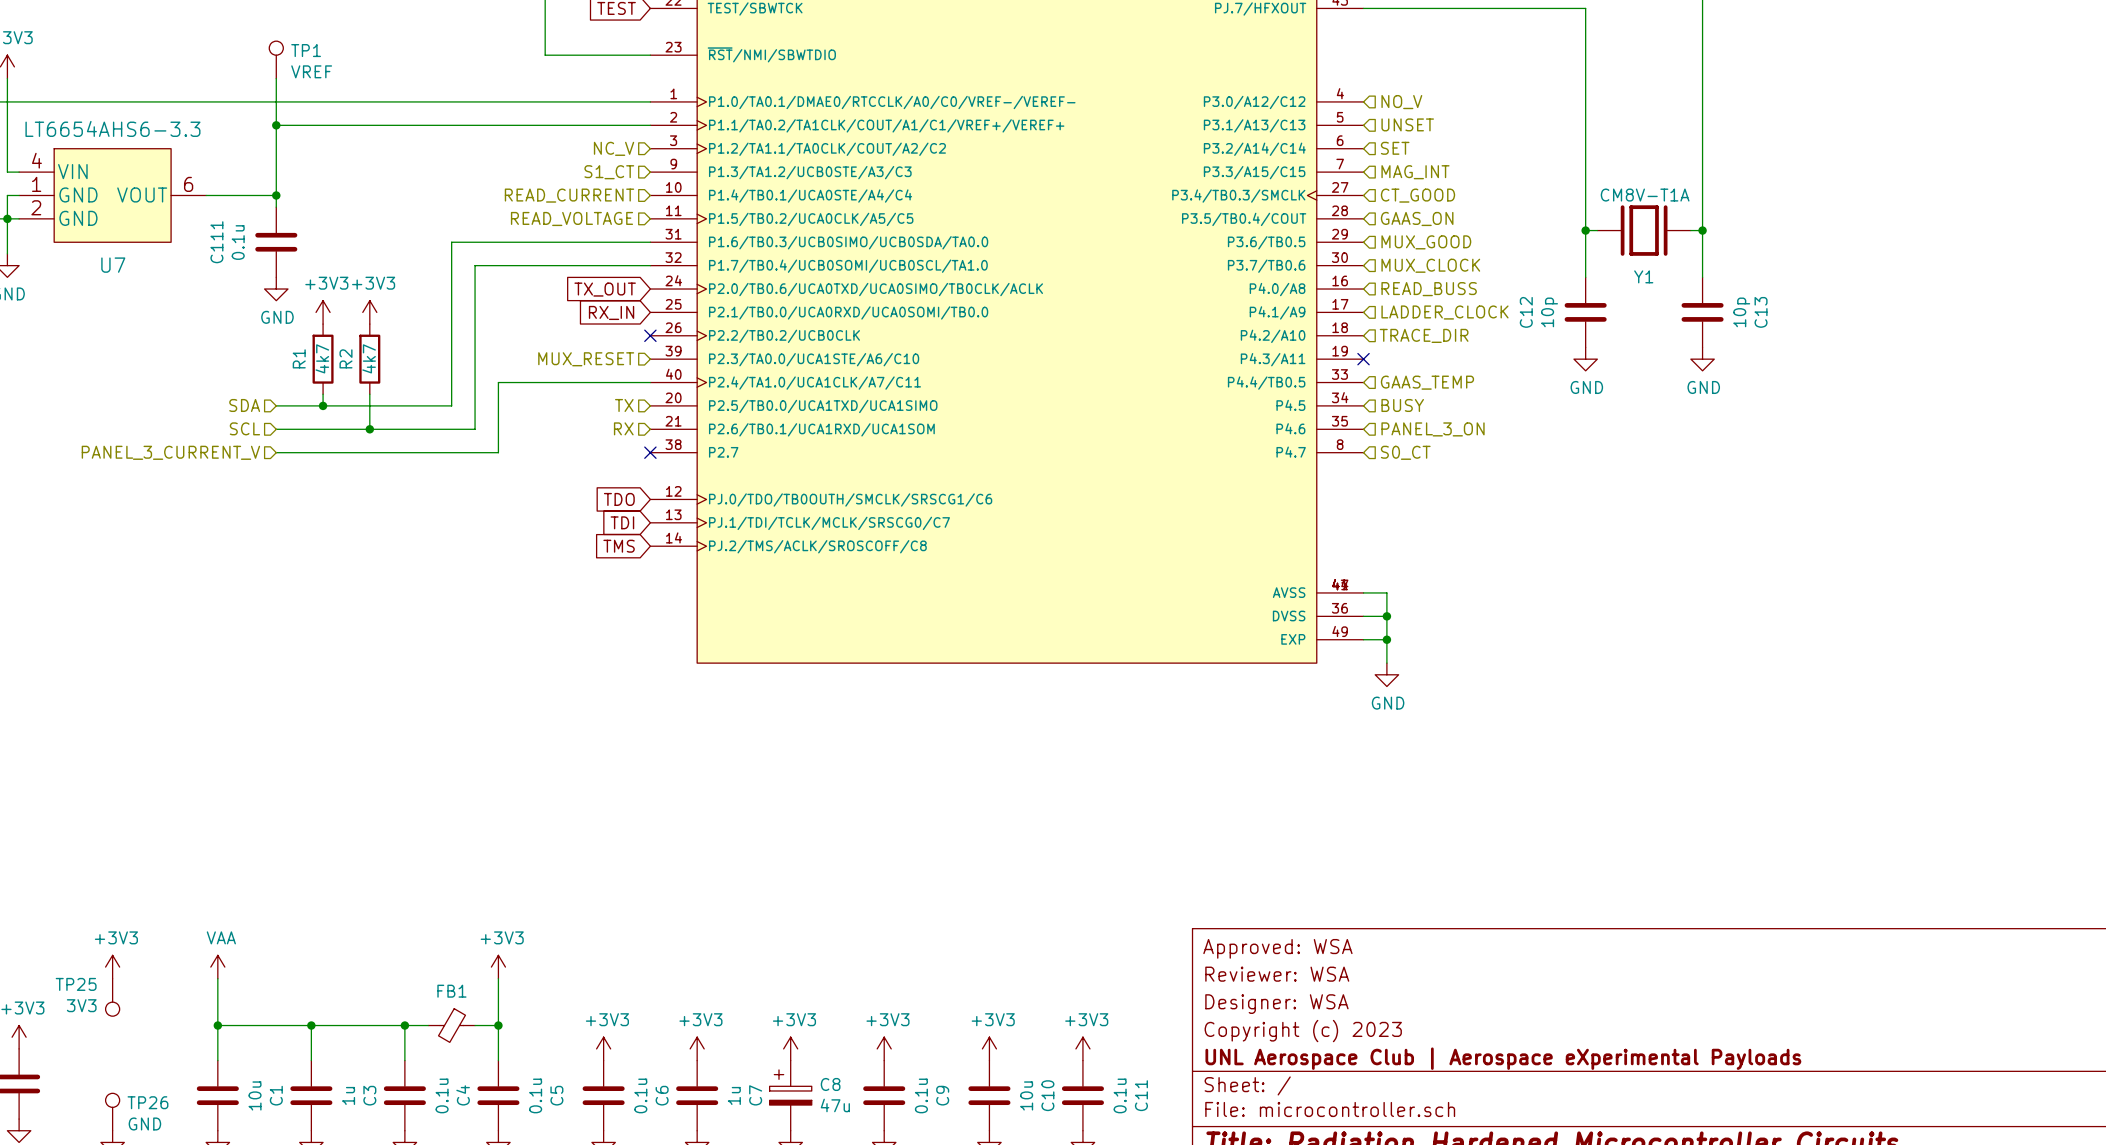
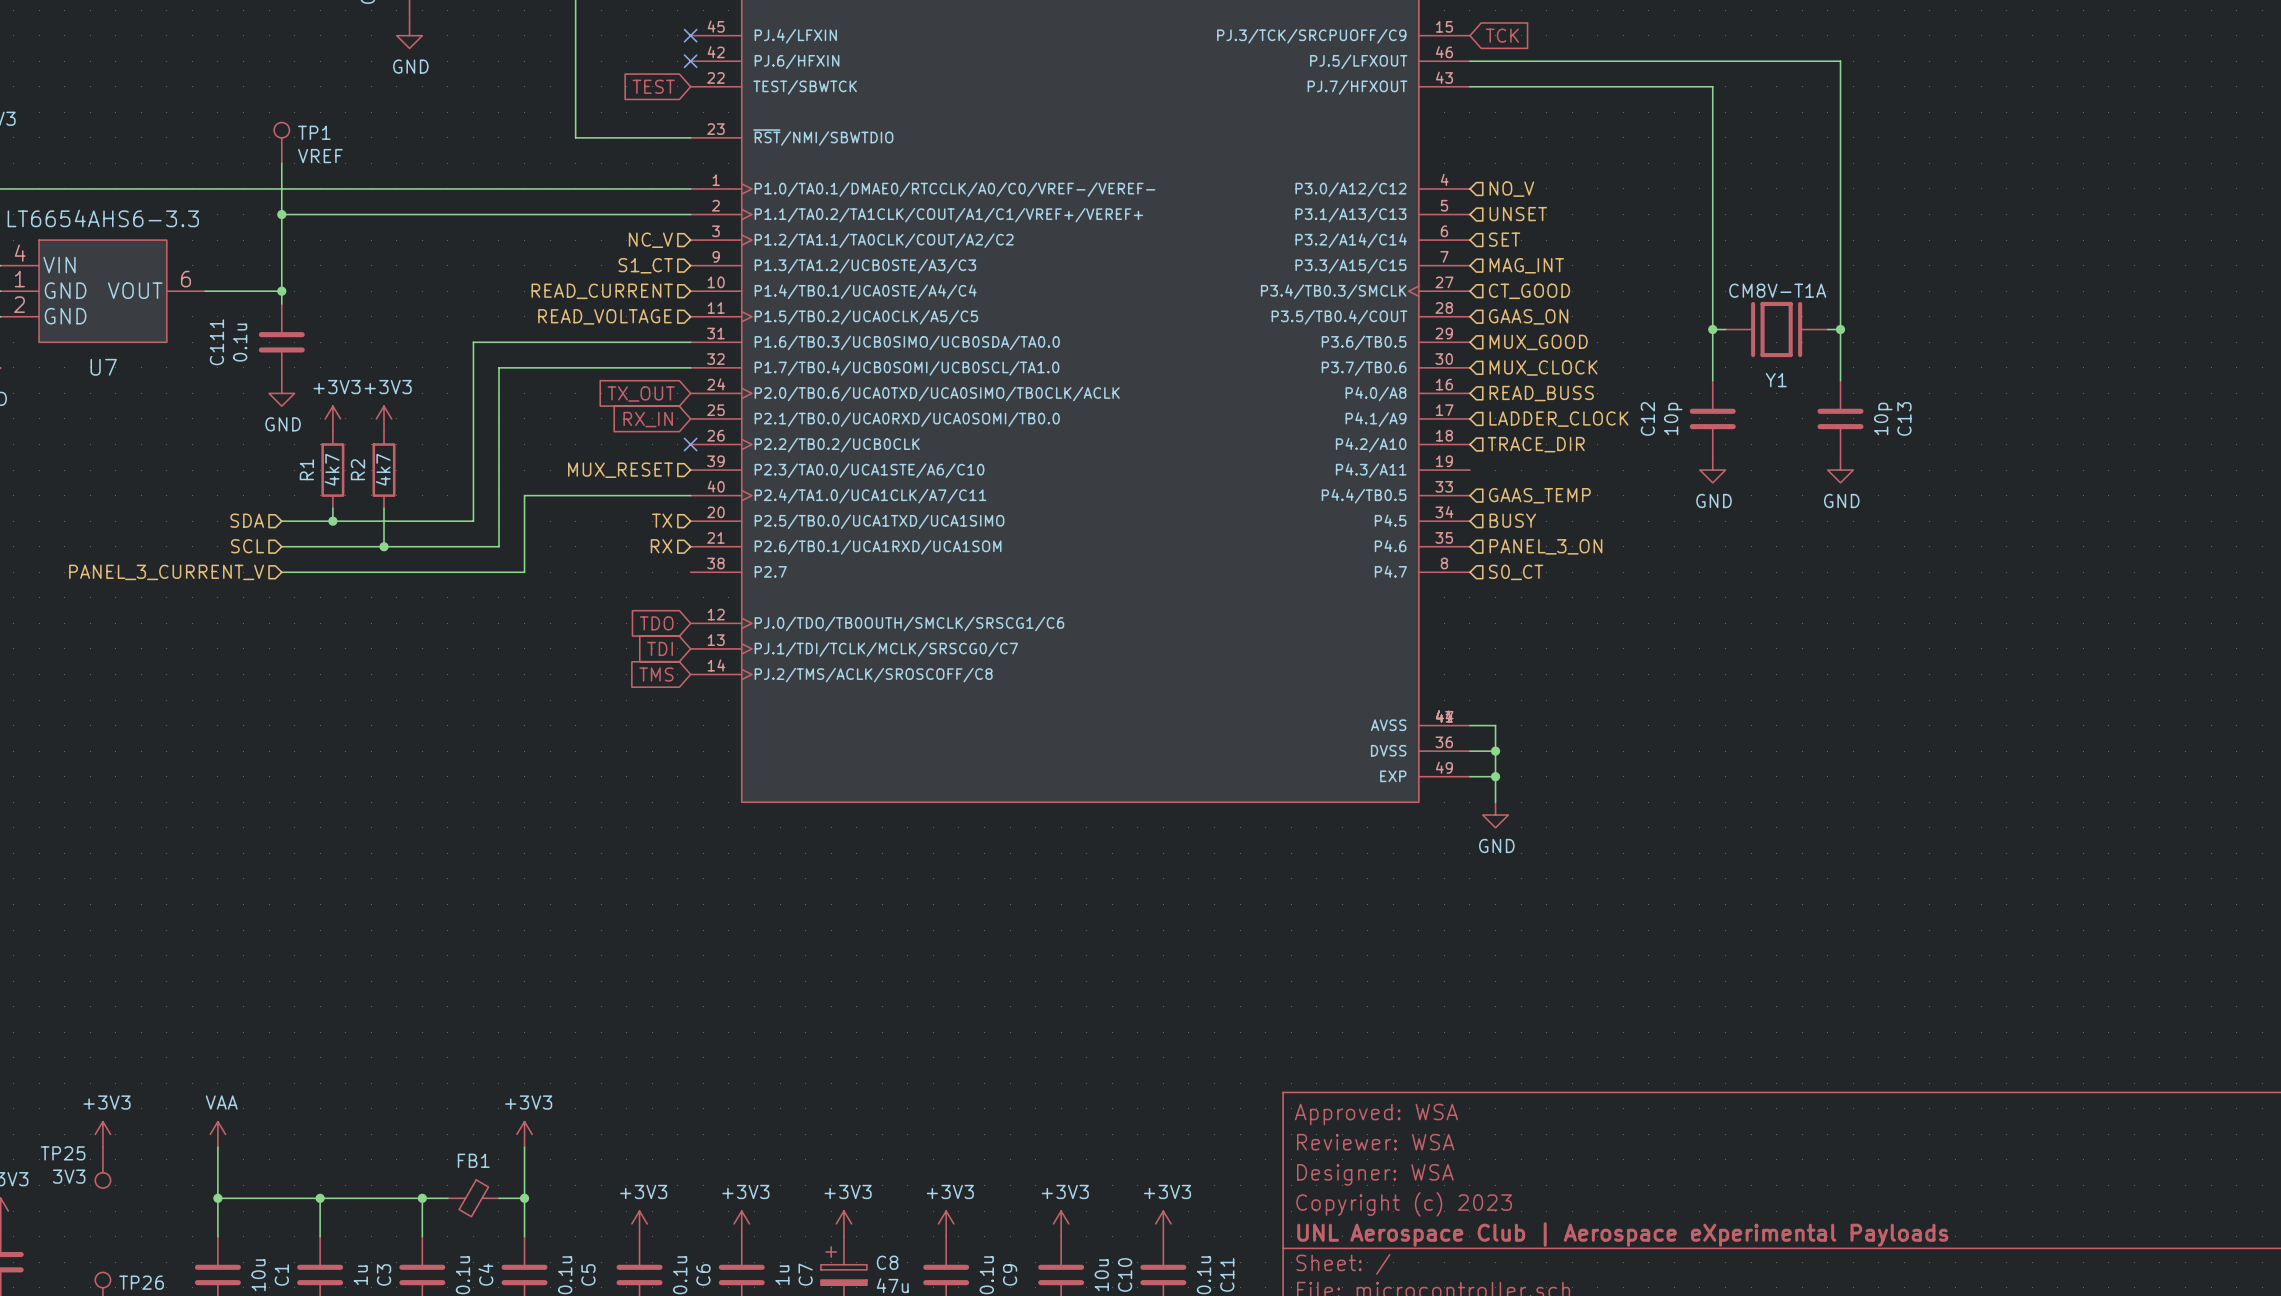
no-connect mark: (1363, 359) -> none
no-connect mark: (650, 452) -> none

